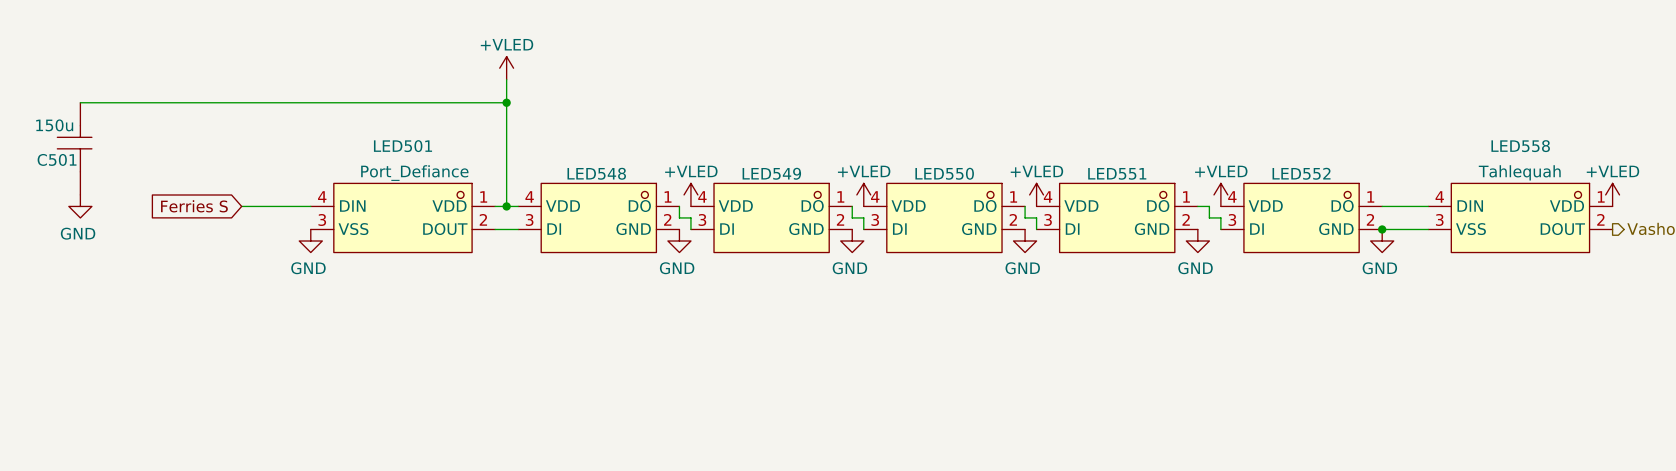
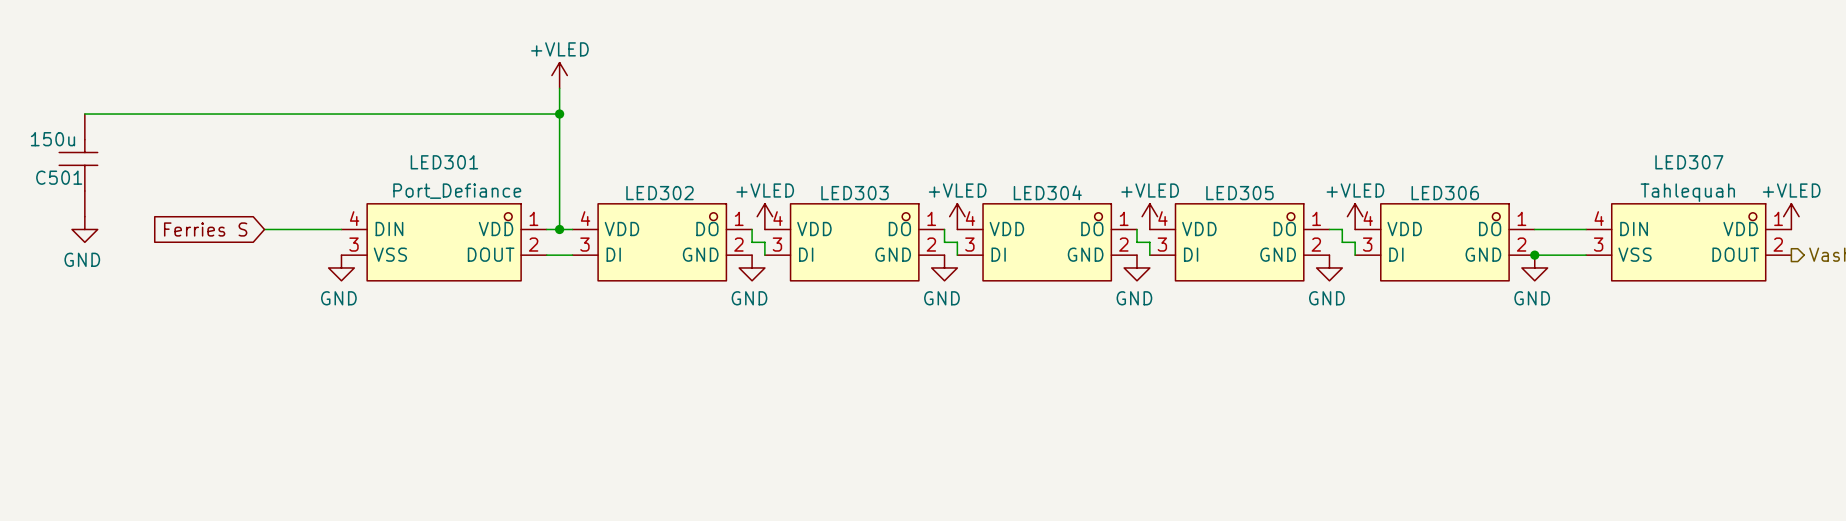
LED501 name: LED501 (403, 146) -> LED301 (444, 162)
LED558 name: LED558 (1520, 146) -> LED307 (1689, 162)
LED548 name: LED548 (596, 173) -> LED302 (659, 193)
LED549 name: LED549 (771, 173) -> LED303 (855, 193)
LED550 name: LED550 (944, 173) -> LED304 (1047, 192)
LED551 name: LED551 (1117, 173) -> LED305 (1239, 193)
LED552 name: LED552 (1301, 173) -> LED306 (1445, 193)

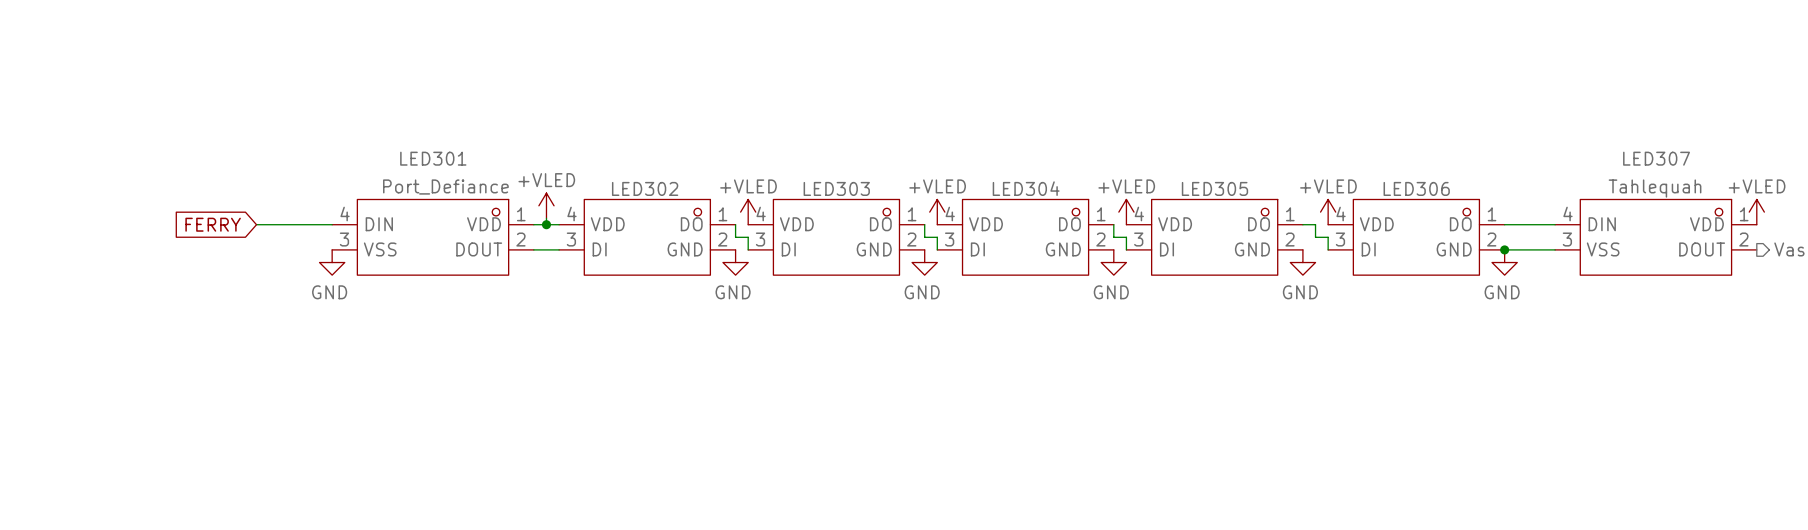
power symbol position: +VLED (559, 75) -> +VLED (546, 205)
wire: (559, 88) (559, 223) -> none
wire: (84, 114) (559, 114) -> none
junction: (559, 114) -> none
C501: 150u (78, 165) -> none
power symbol: GND (84, 229) -> none
global label: Ferries S (205, 229) -> FERRY (213, 224)

